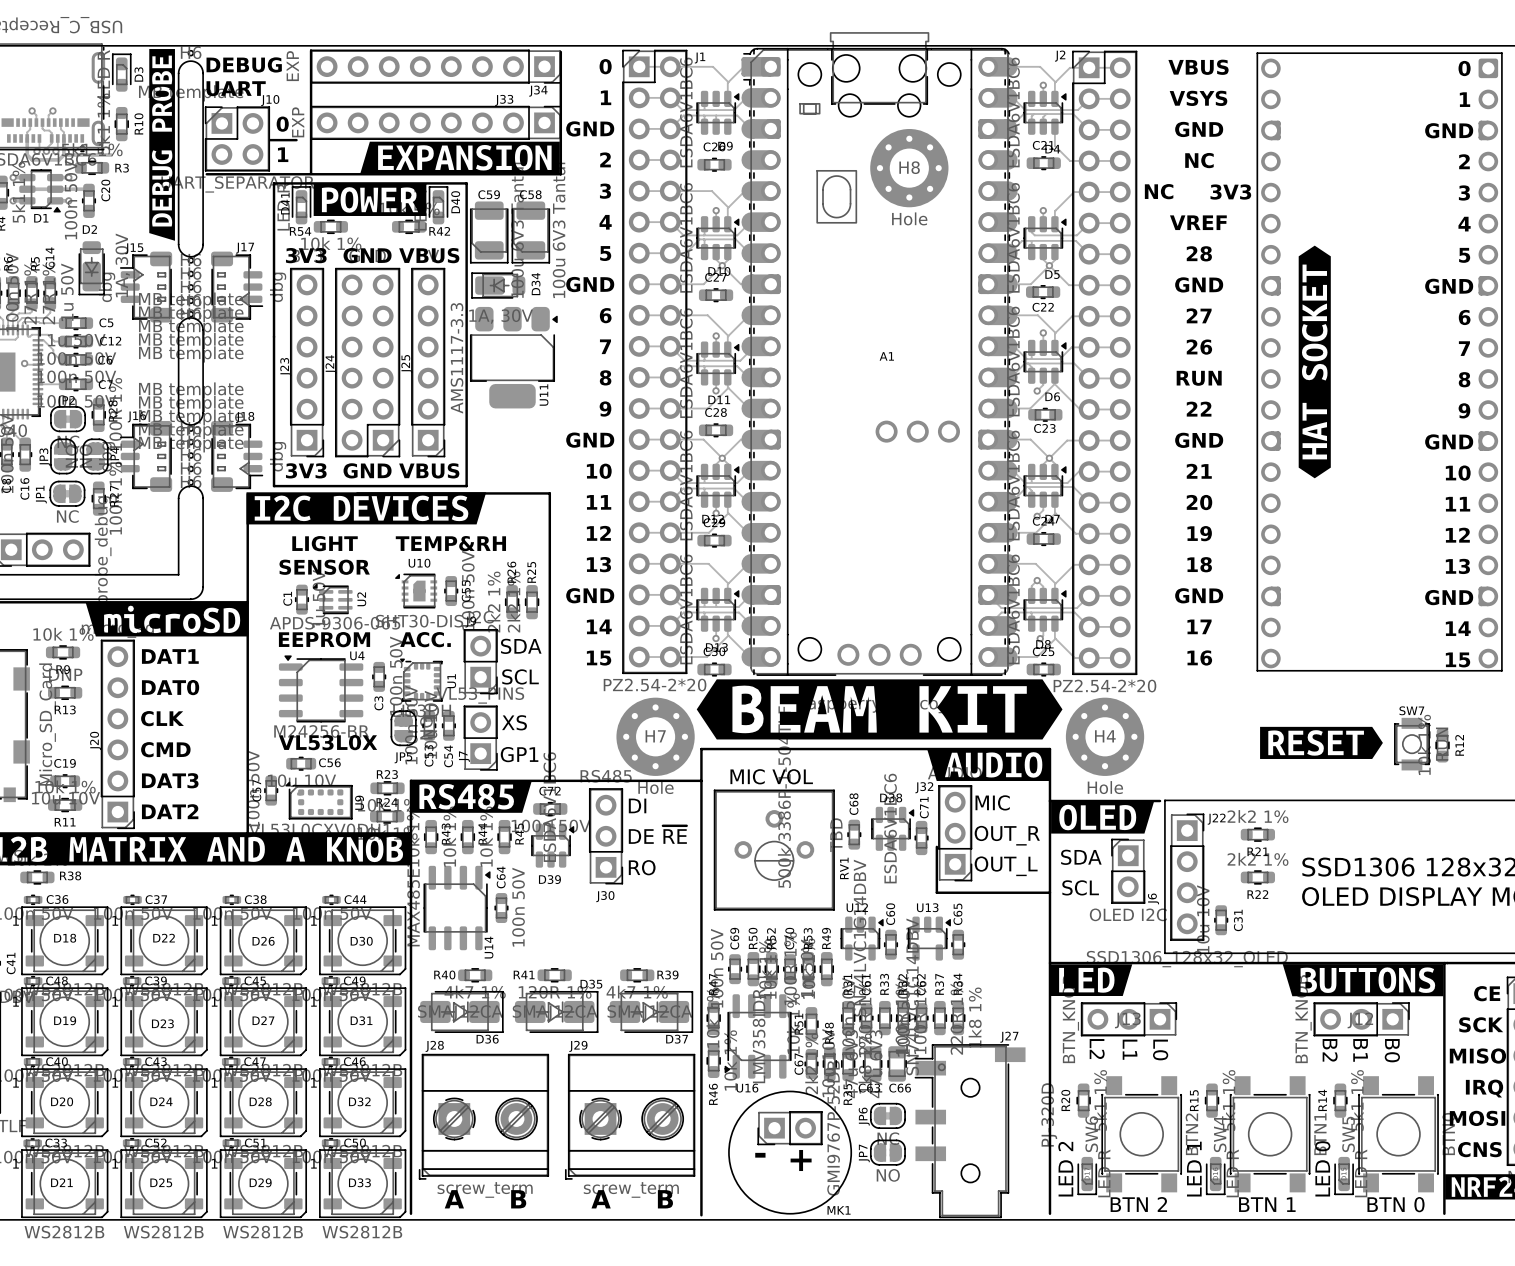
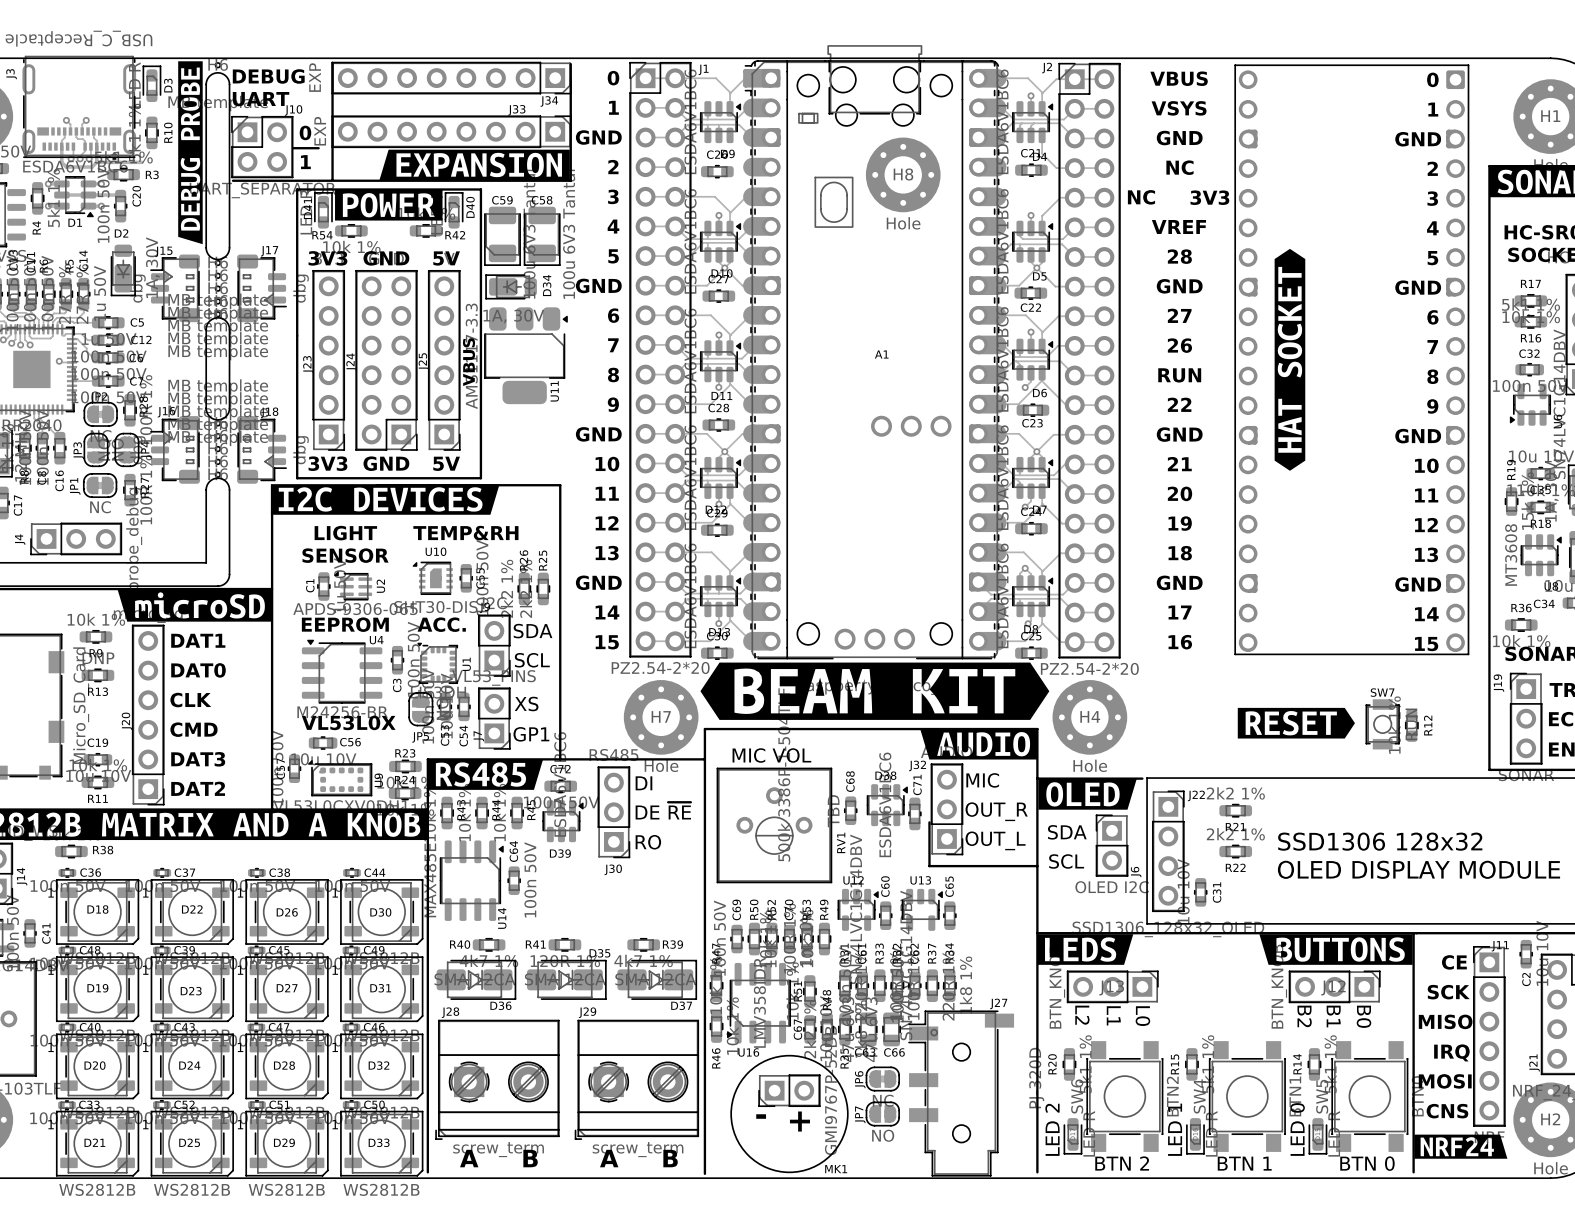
text: VBUS (429, 255) -> 5V (446, 258)
text: none -> VBUS (469, 362)
text: VBUS (429, 470) -> 5V (446, 463)
drawing shape: [1050, 964, 1133, 996] -> [1037, 934, 1134, 965]

